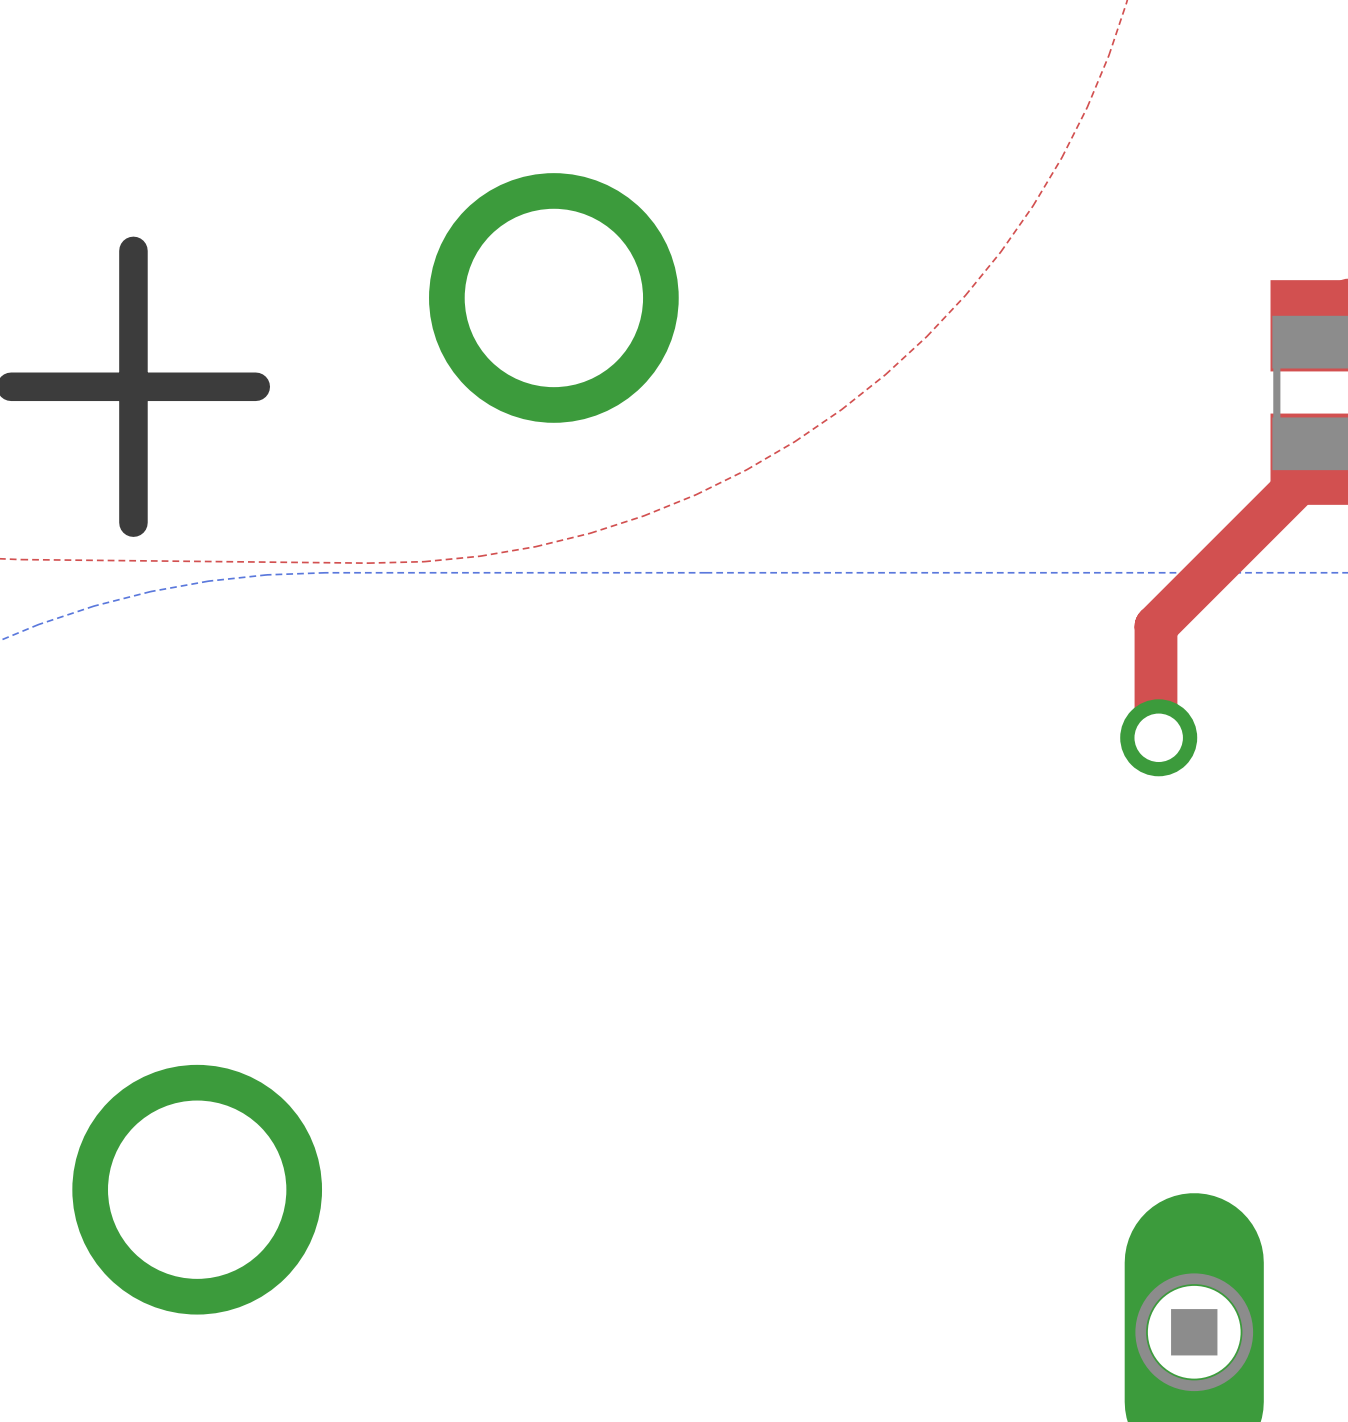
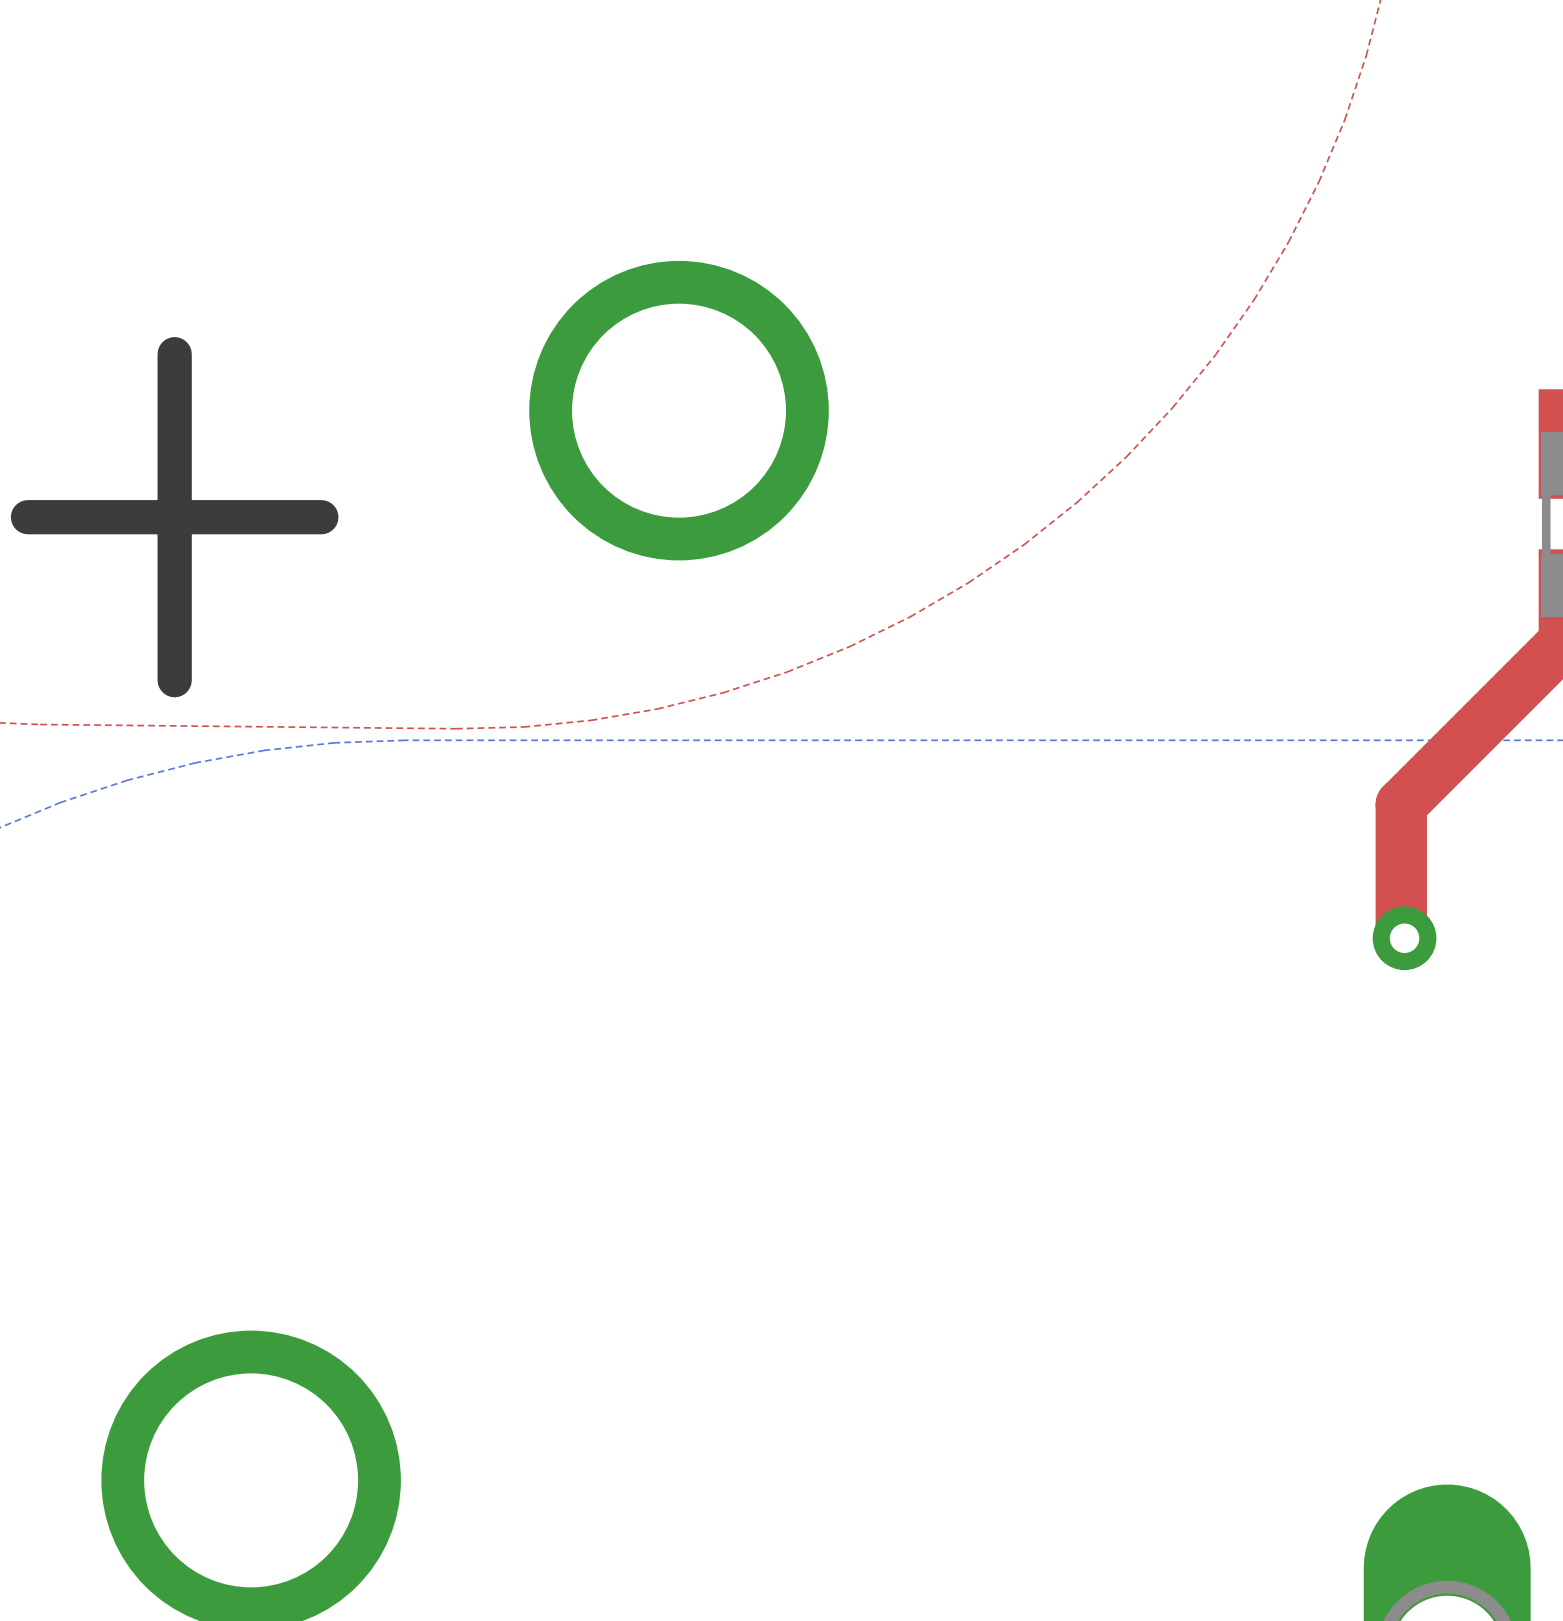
via size: [1120, 699, 1198, 777] -> [1372, 906, 1437, 971]

